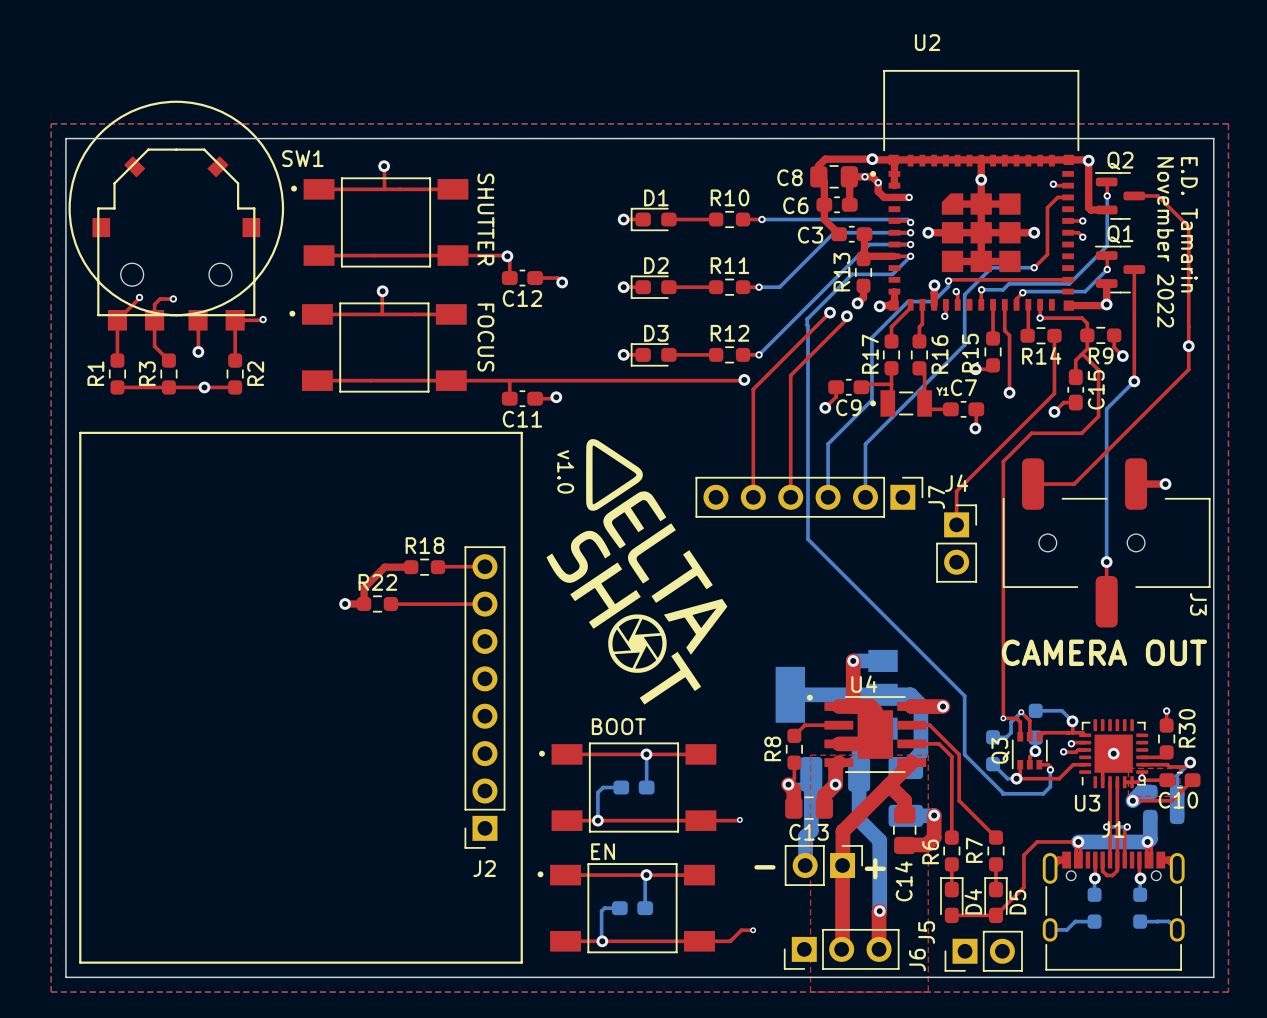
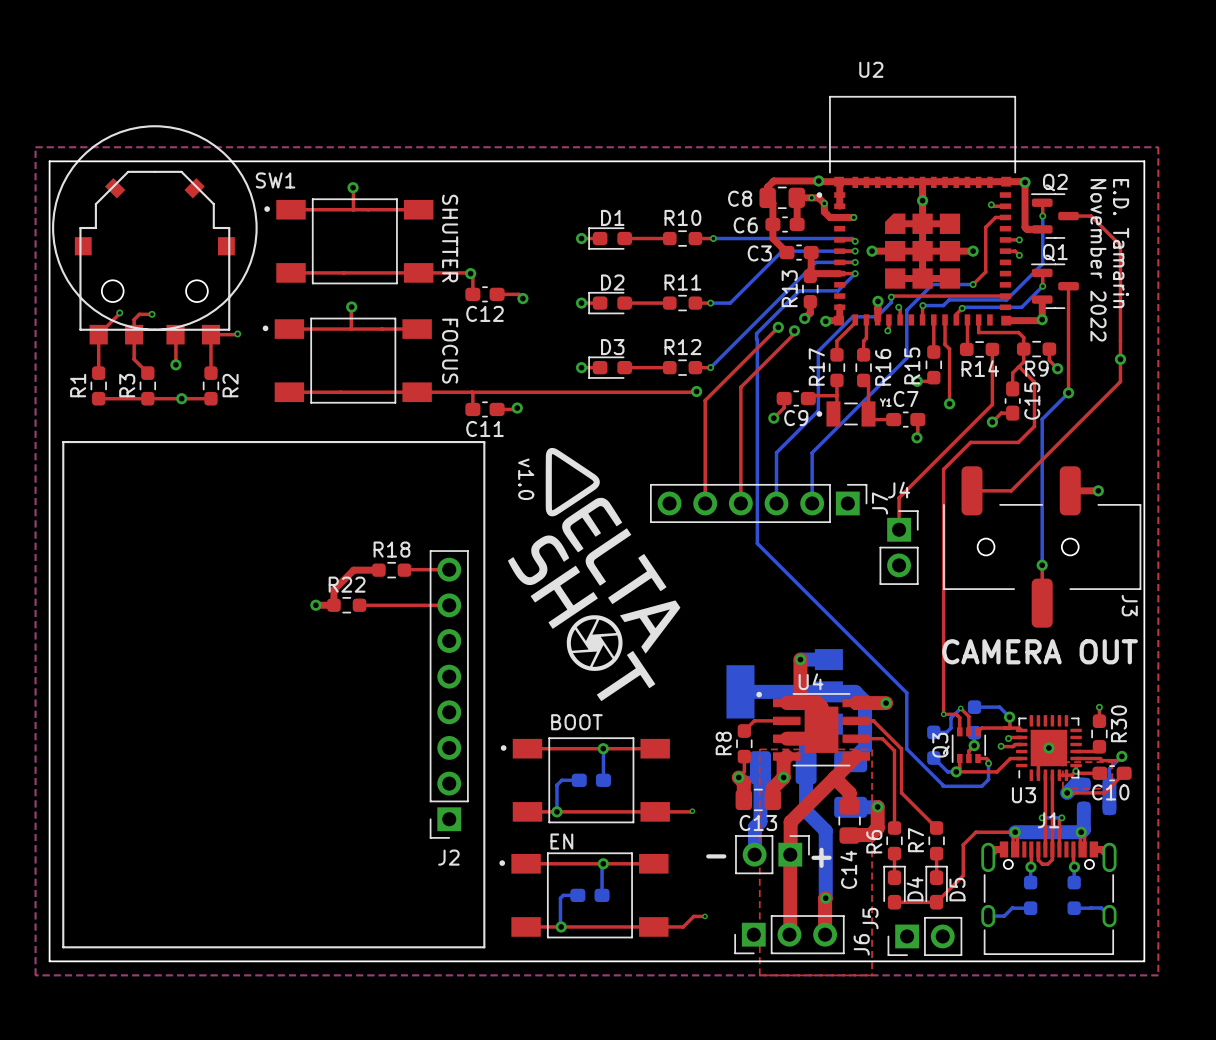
via: (1040, 318) -> none

